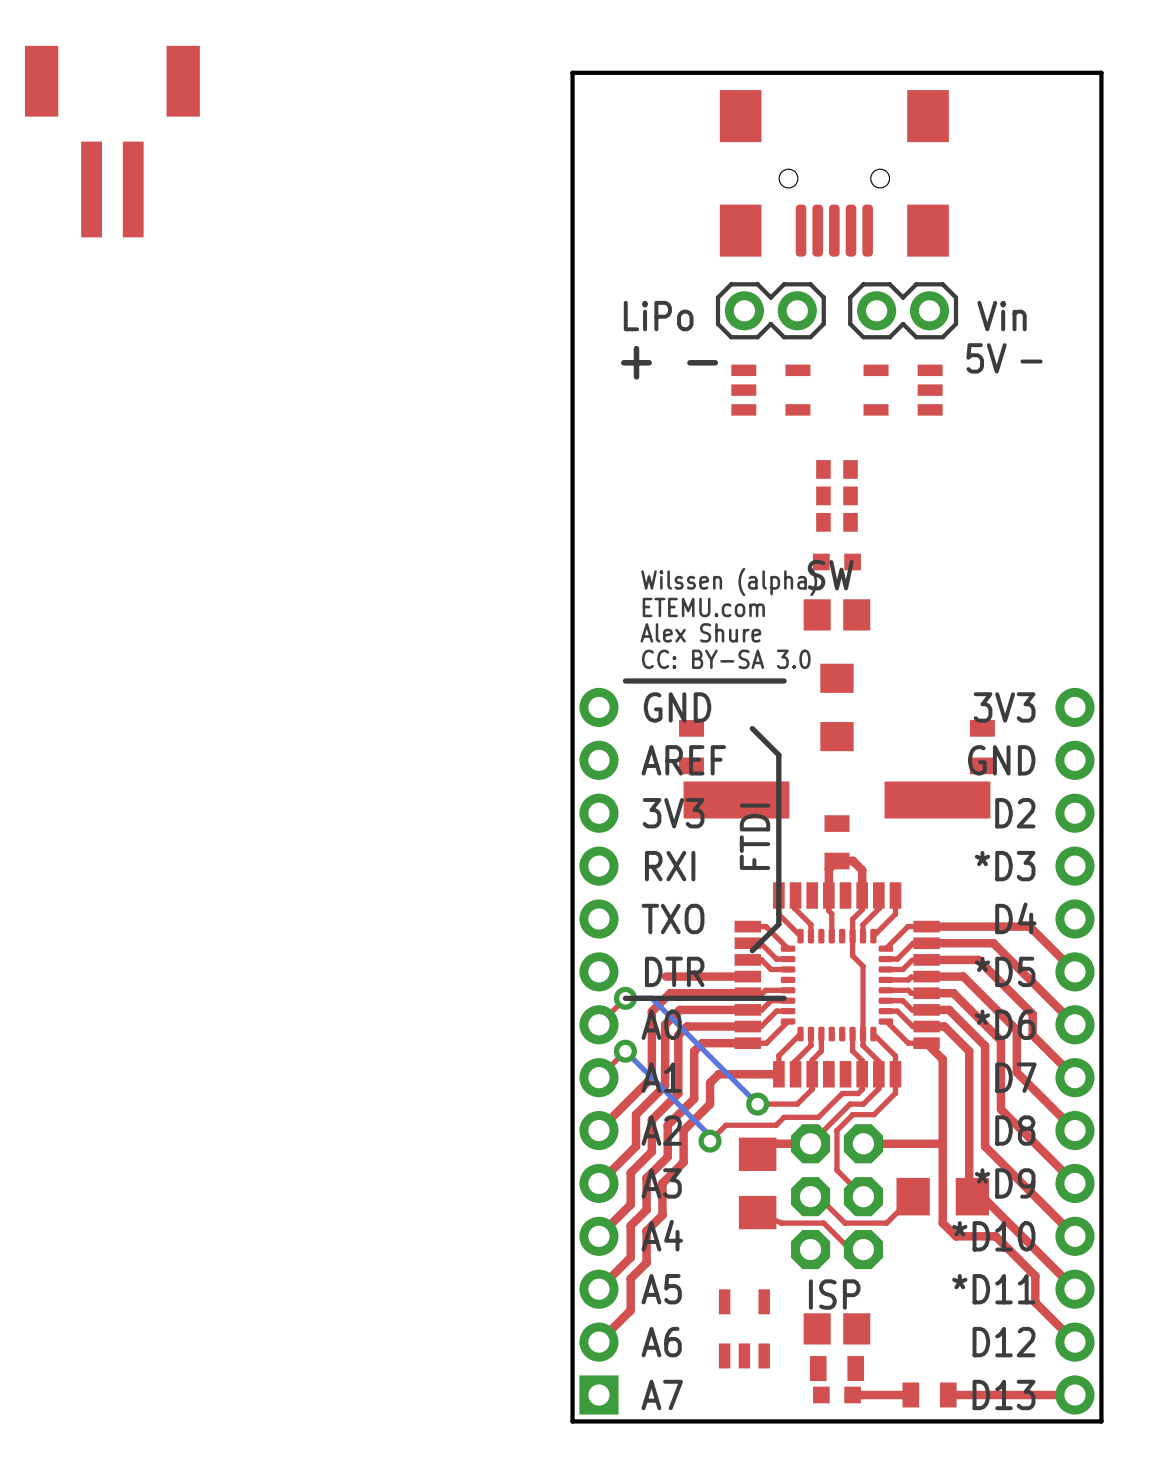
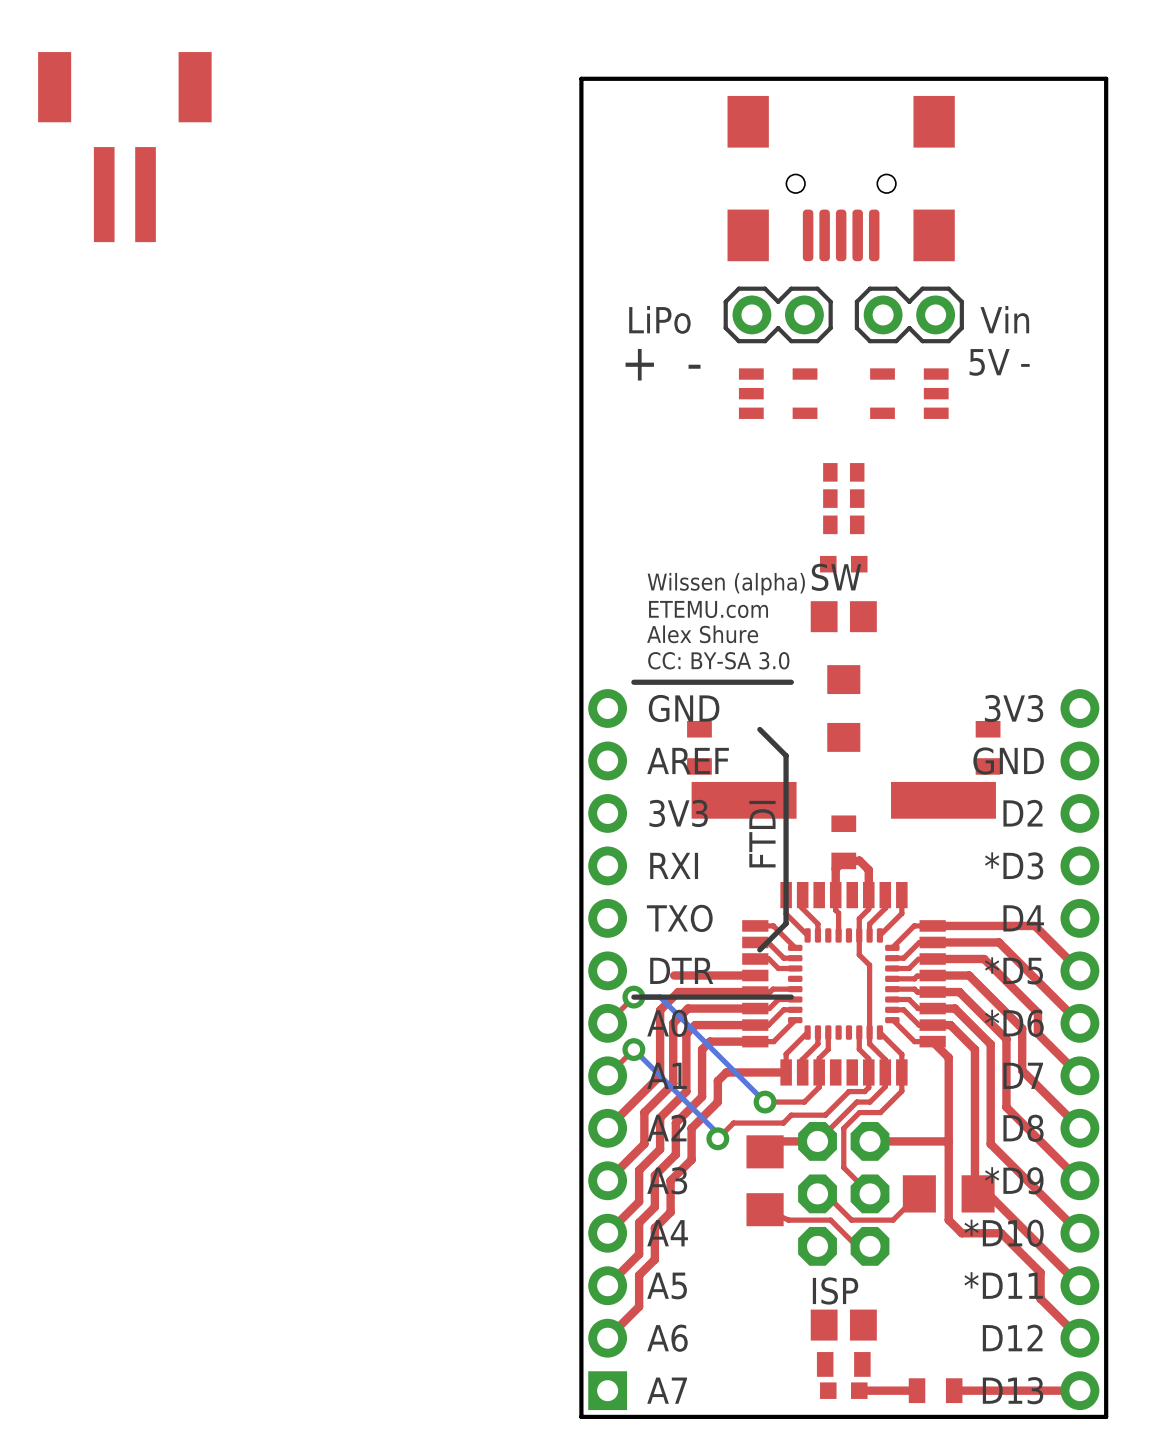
part: (744, 1328) -> none

